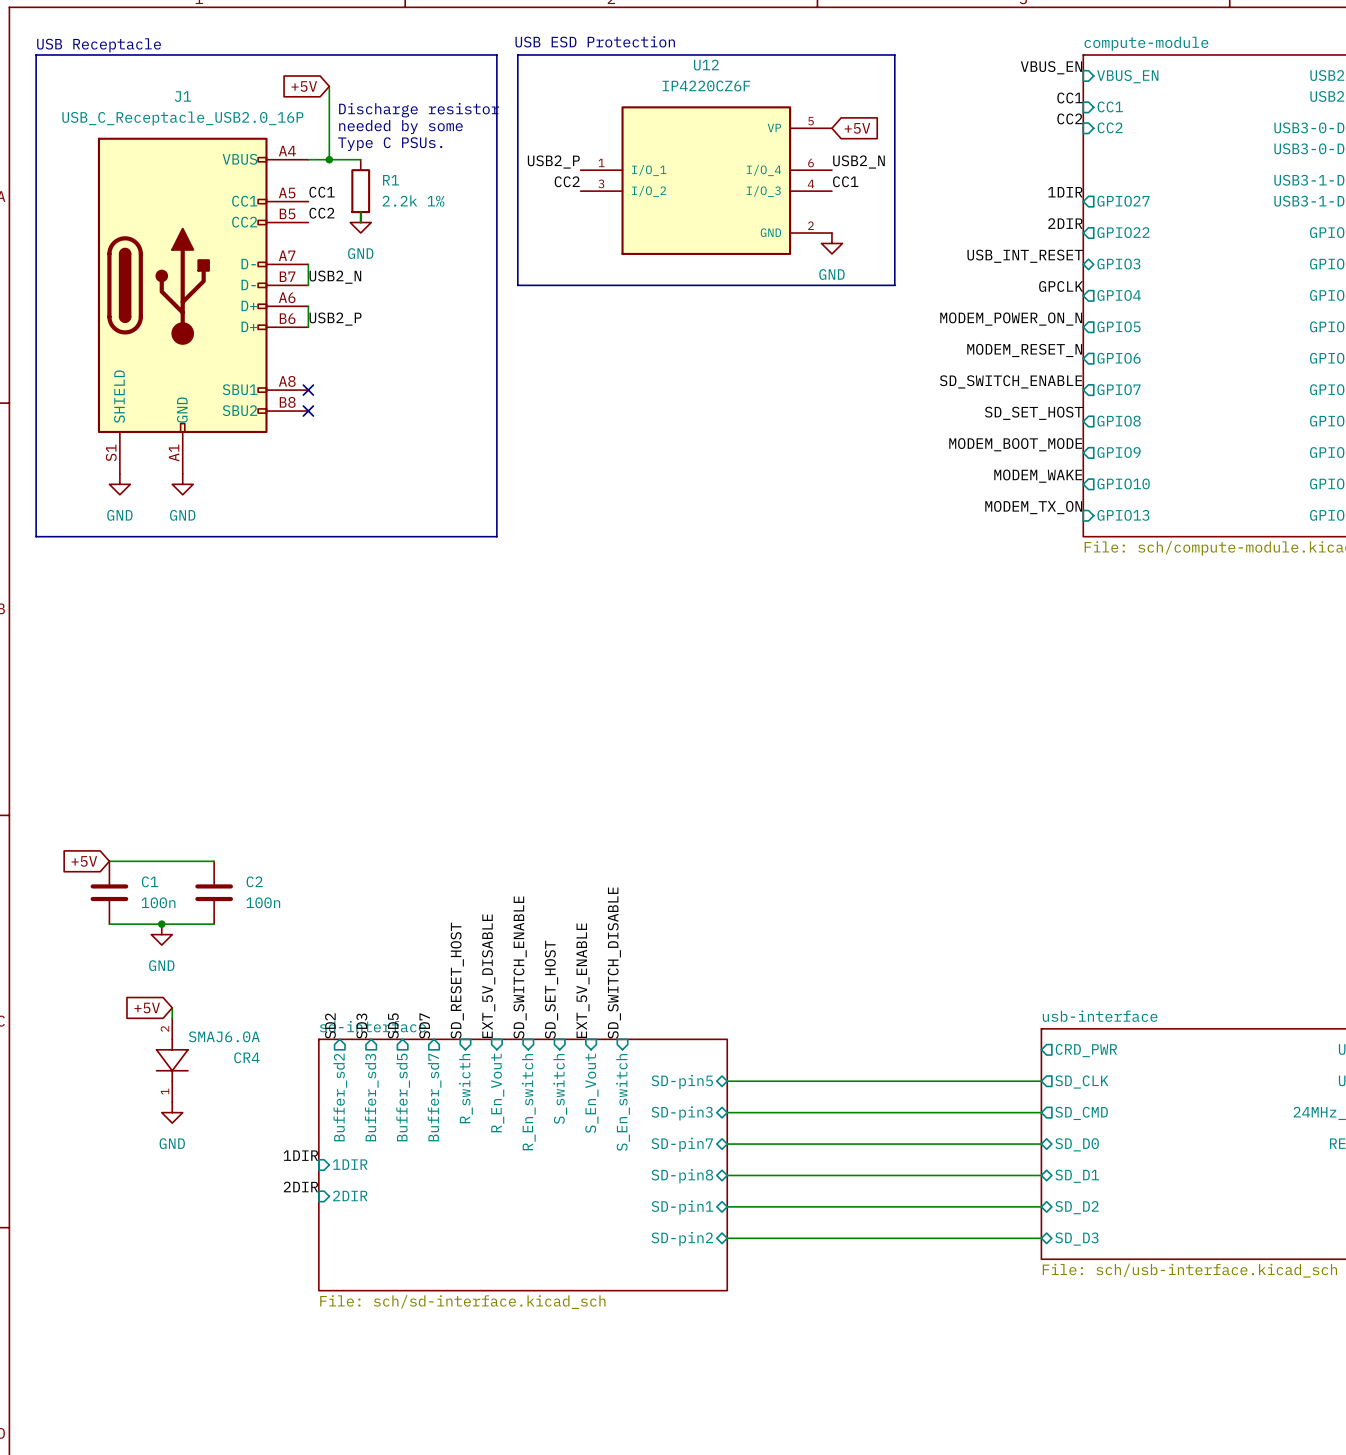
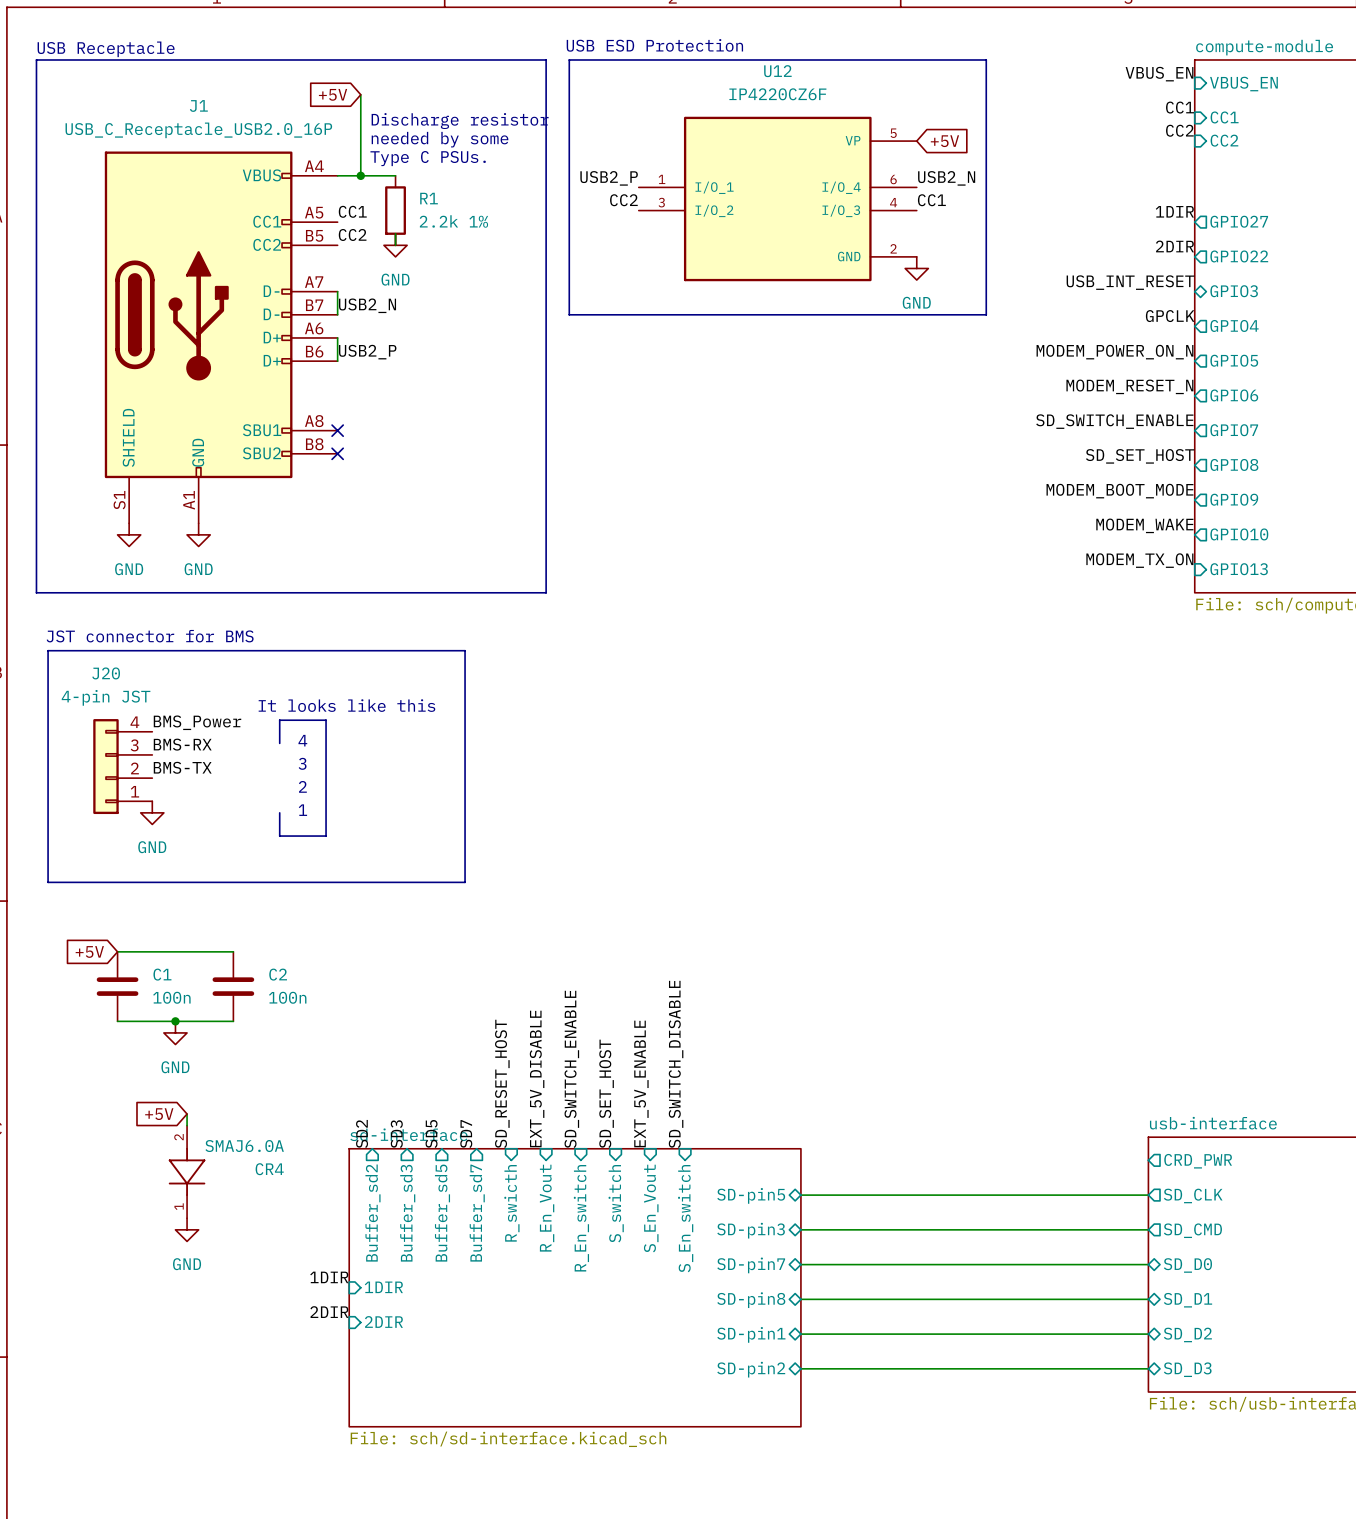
text: none -> JST connector for BMS (150, 636)
line: none -> (48, 650) (465, 650) (465, 882) (48, 882) (48, 650)
text: none -> It looks like this (346, 705)
label: none -> BMS_Power (197, 722)
text: none -> 4 (302, 740)
line: none -> (279, 743) (279, 720) (326, 720) (326, 836) (279, 836) (279, 812)
label: none -> BMS-RX (182, 744)
text: none -> 3 (302, 763)
J20: none -> 4-pin JST (122, 766)
label: none -> BMS-TX (182, 767)
text: none -> 2 (302, 786)
text: none -> 1 (302, 810)
power symbol: none -> GND (152, 812)

